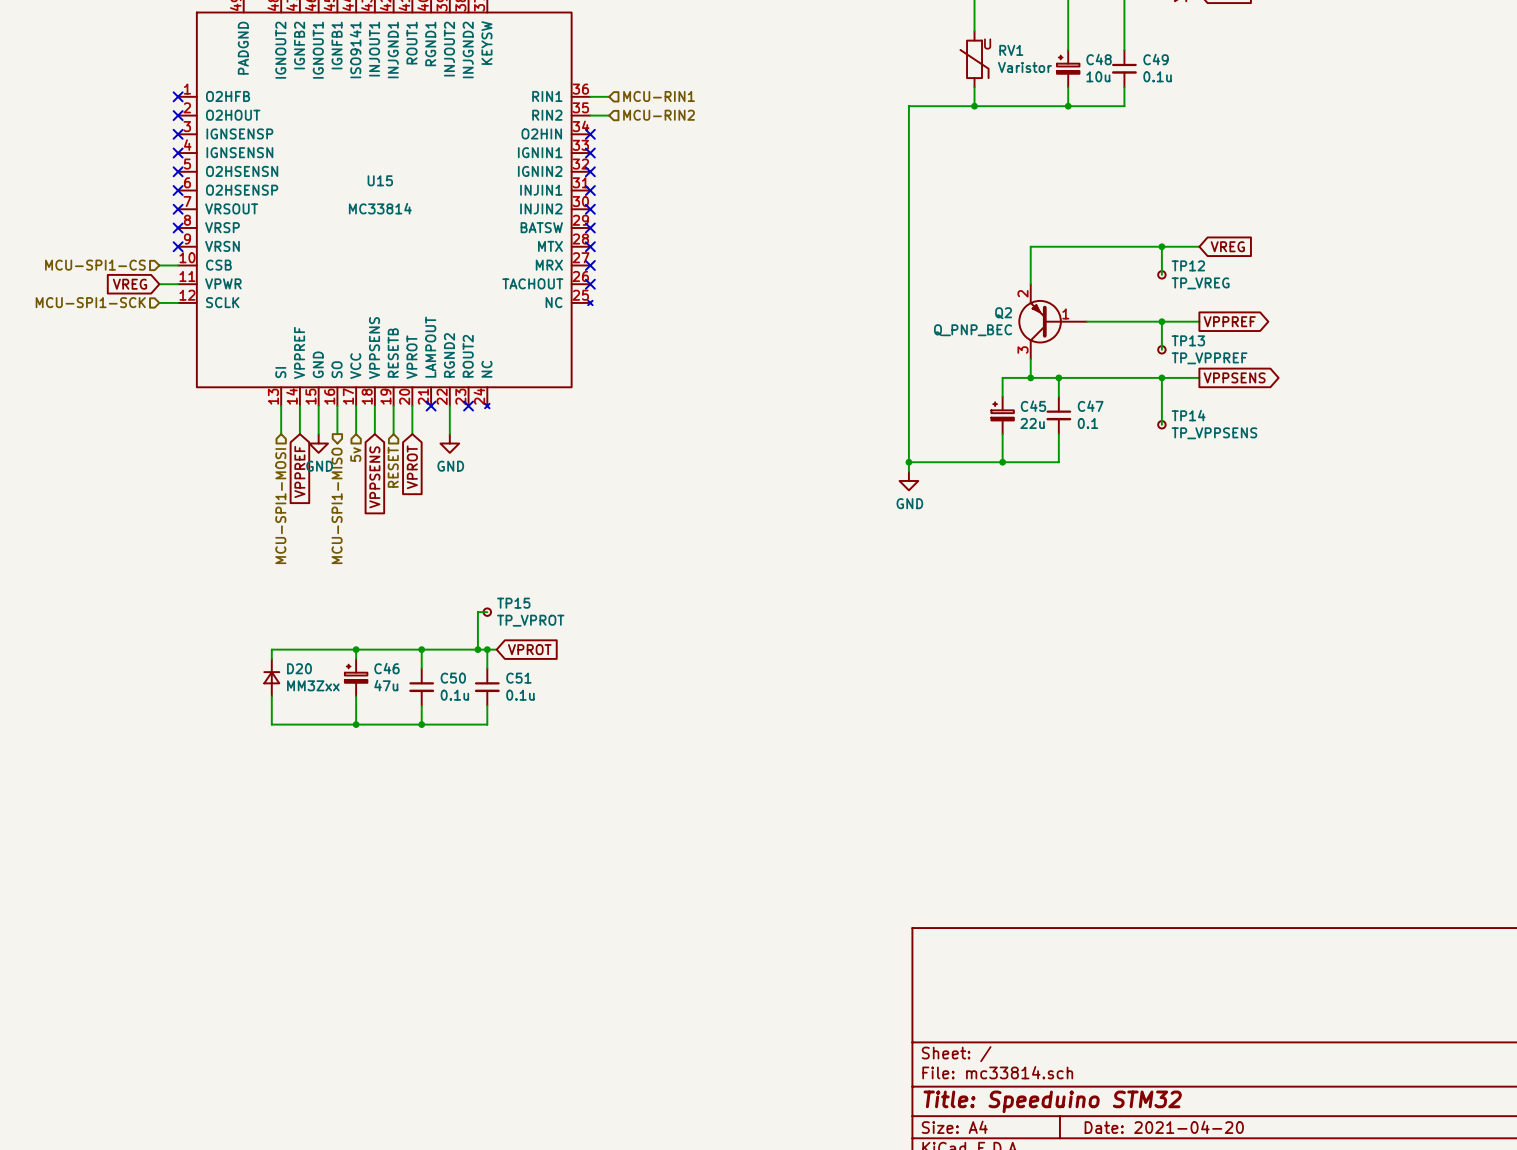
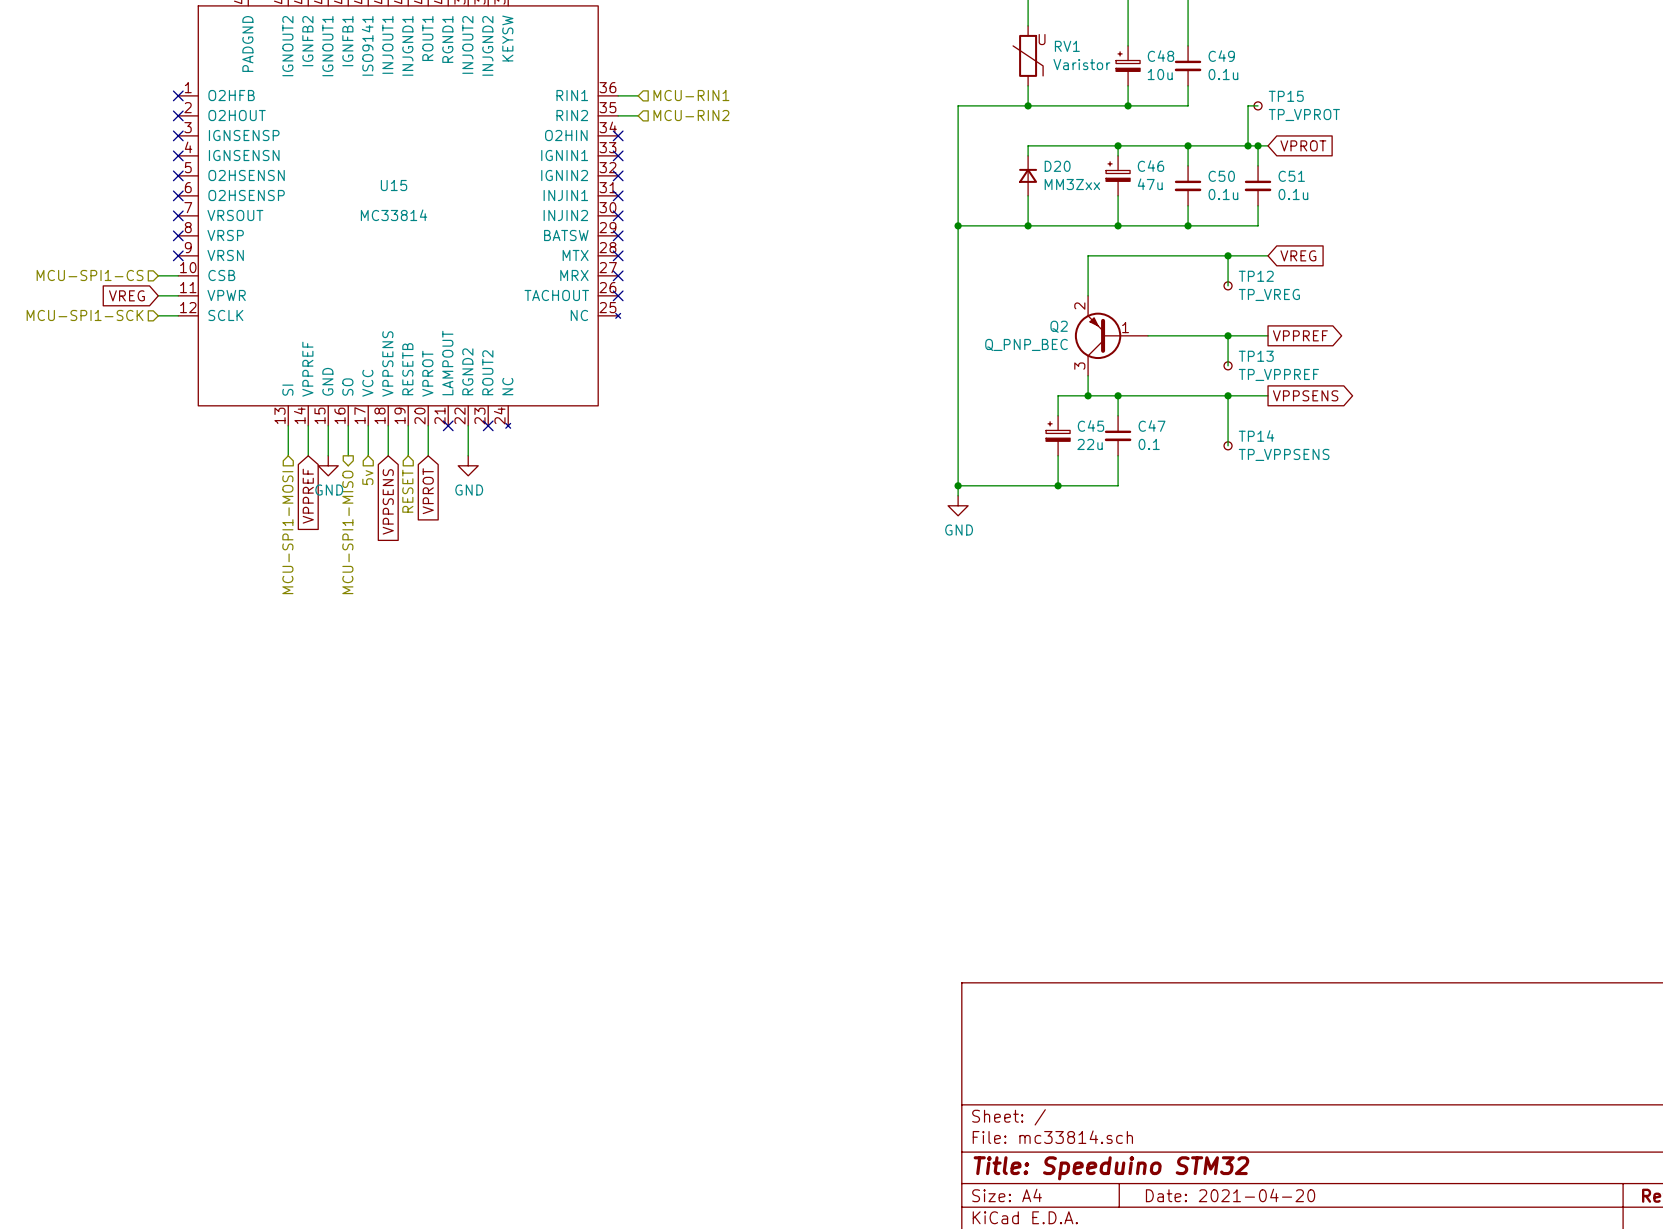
wire: none -> (1258, 105) (1248, 105) (1248, 145)
wire: none -> (1118, 145) (1118, 155)
junction: none -> (1118, 145)
wire: none -> (1188, 145) (1188, 165)
junction: none -> (1188, 145)
junction: none -> (1248, 145)
wire: none -> (1258, 145) (1258, 165)
junction: none -> (1258, 145)
wire: none -> (1268, 145) (1028, 145) (1028, 155)
global label: none -> VPROT (1303, 145)
wire: none -> (1028, 195) (1028, 225)
wire: none -> (1118, 195) (1118, 225)
wire: none -> (1188, 205) (1188, 225)
wire: none -> (1258, 205) (1258, 225) (958, 225)
junction: none -> (958, 225)
junction: none -> (1028, 225)
junction: none -> (1118, 225)
junction: none -> (1188, 225)
wire: (487, 612) (477, 612) (477, 649) -> none
TP15 position: (487, 612) -> (1258, 105)
wire: (356, 649) (356, 659) -> none
junction: (356, 649) -> none
wire: (421, 649) (421, 668) -> none
junction: (421, 649) -> none
junction: (477, 649) -> none
wire: (487, 649) (487, 668) -> none
junction: (487, 649) -> none
wire: (496, 649) (271, 649) (271, 659) -> none
global label: VPROT (529, 649) -> none
D20 position: (271, 677) -> (1028, 175)
C46 position: (356, 677) -> (1118, 175)
C50 position: (421, 687) -> (1188, 185)
C51 position: (487, 687) -> (1258, 185)
wire: (271, 696) (271, 724) (487, 724) (487, 705) -> none
wire: (356, 696) (356, 724) -> none
wire: (421, 705) (421, 724) -> none
junction: (356, 724) -> none
junction: (421, 724) -> none

